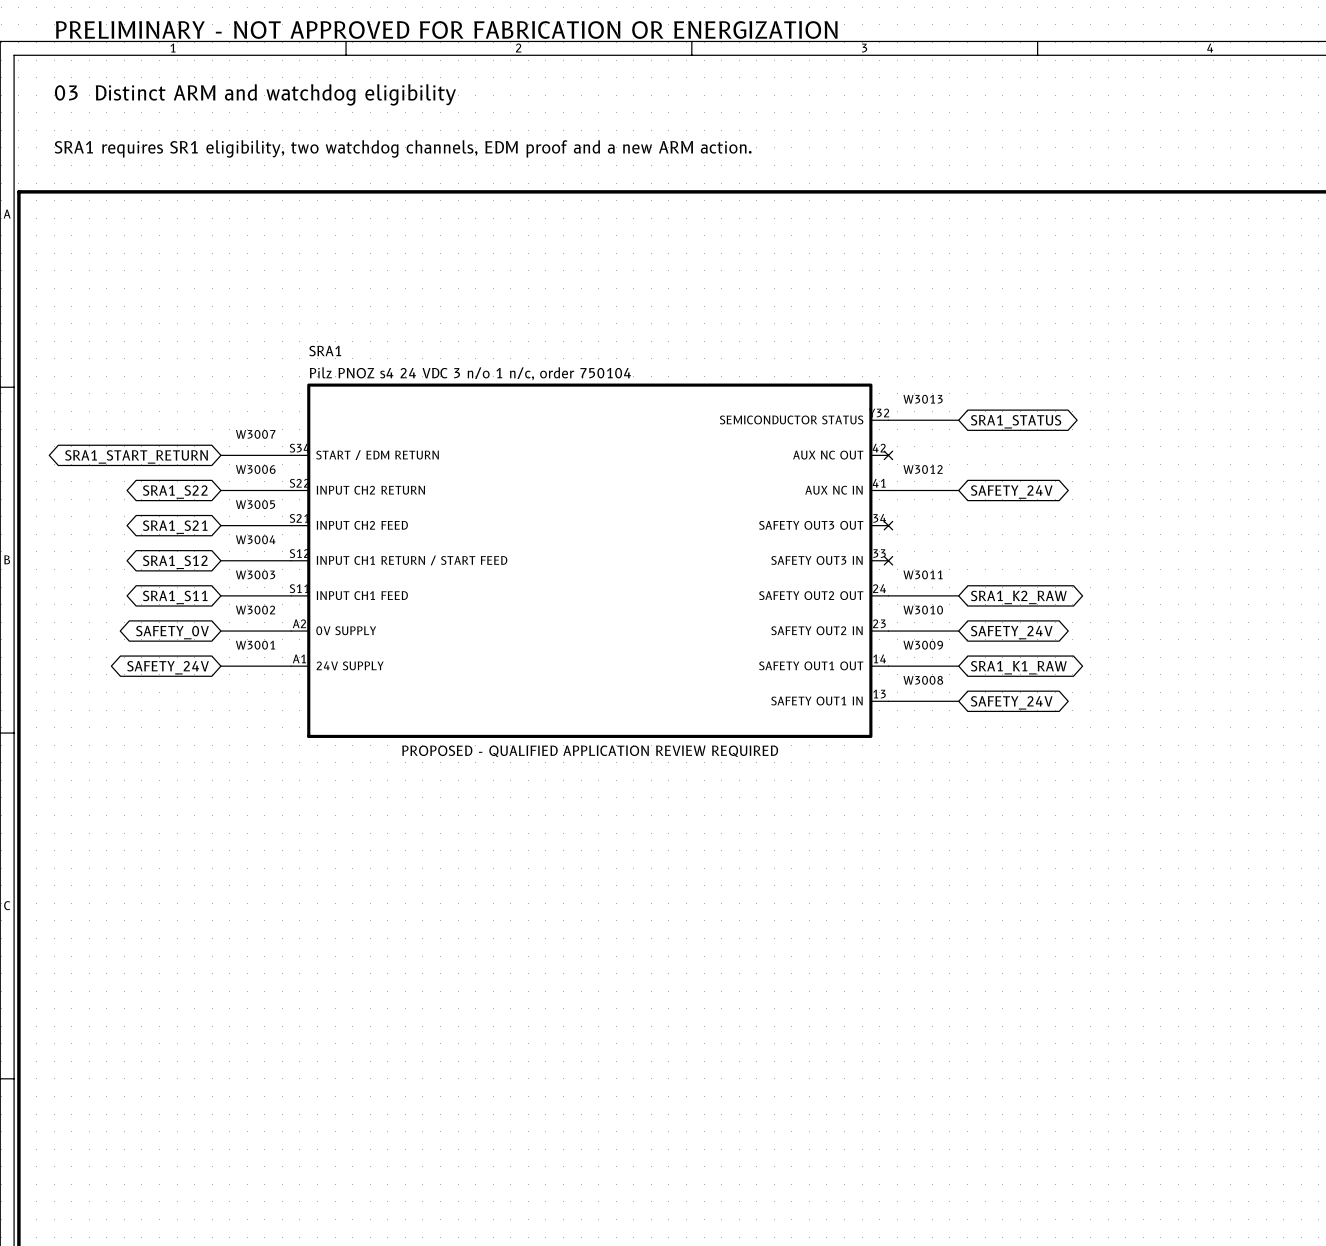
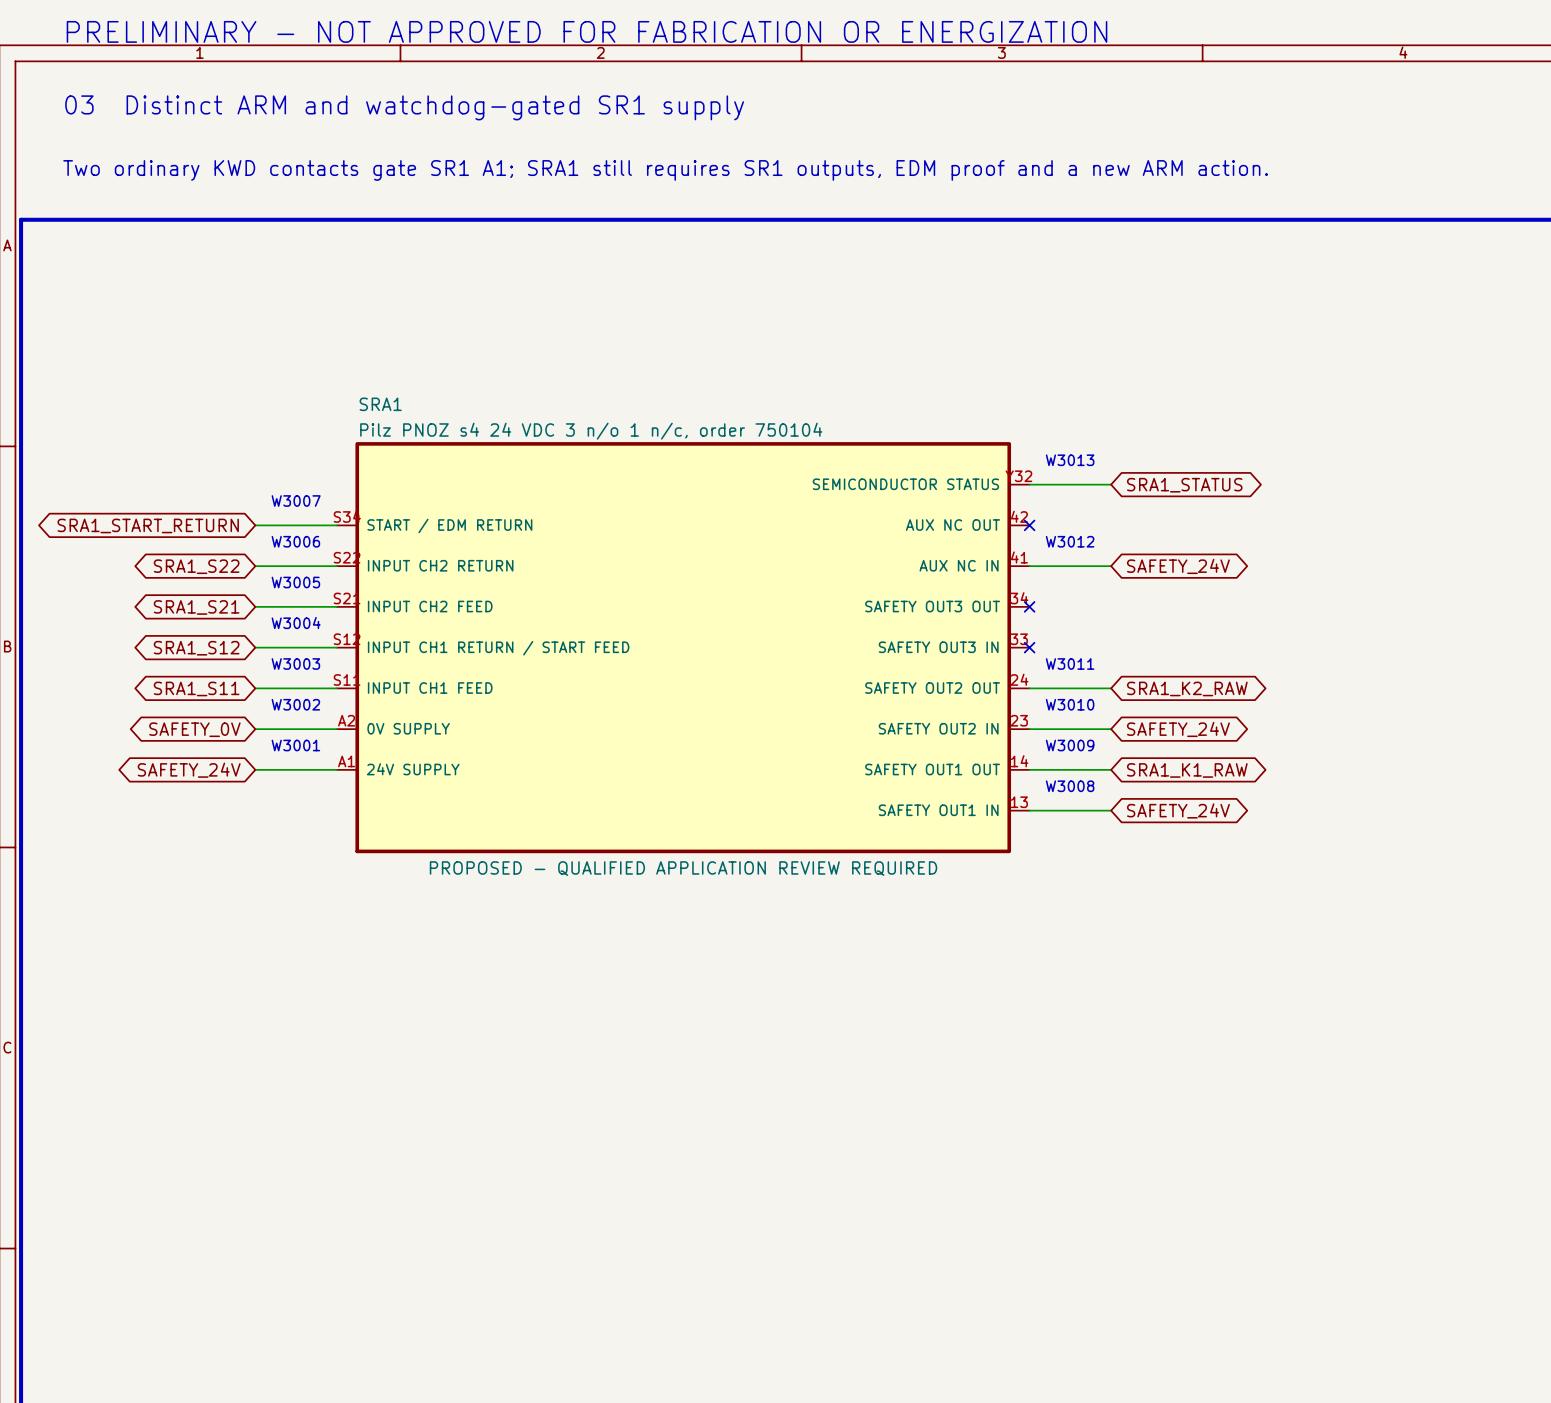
text: 03 Distinct ARM and watchdog eligibility (255, 94) -> 03 Distinct ARM and watchdog-gated SR1 supply (404, 107)
text: SRA1 requires SR1 eligibility, two watchdog channels, EDM proof and a new ARM action. (403, 148) -> Two ordinary KWD contacts gate SR1 A1; SRA1 still requires SR1 outputs, EDM proof and a new ARM action. (665, 170)

